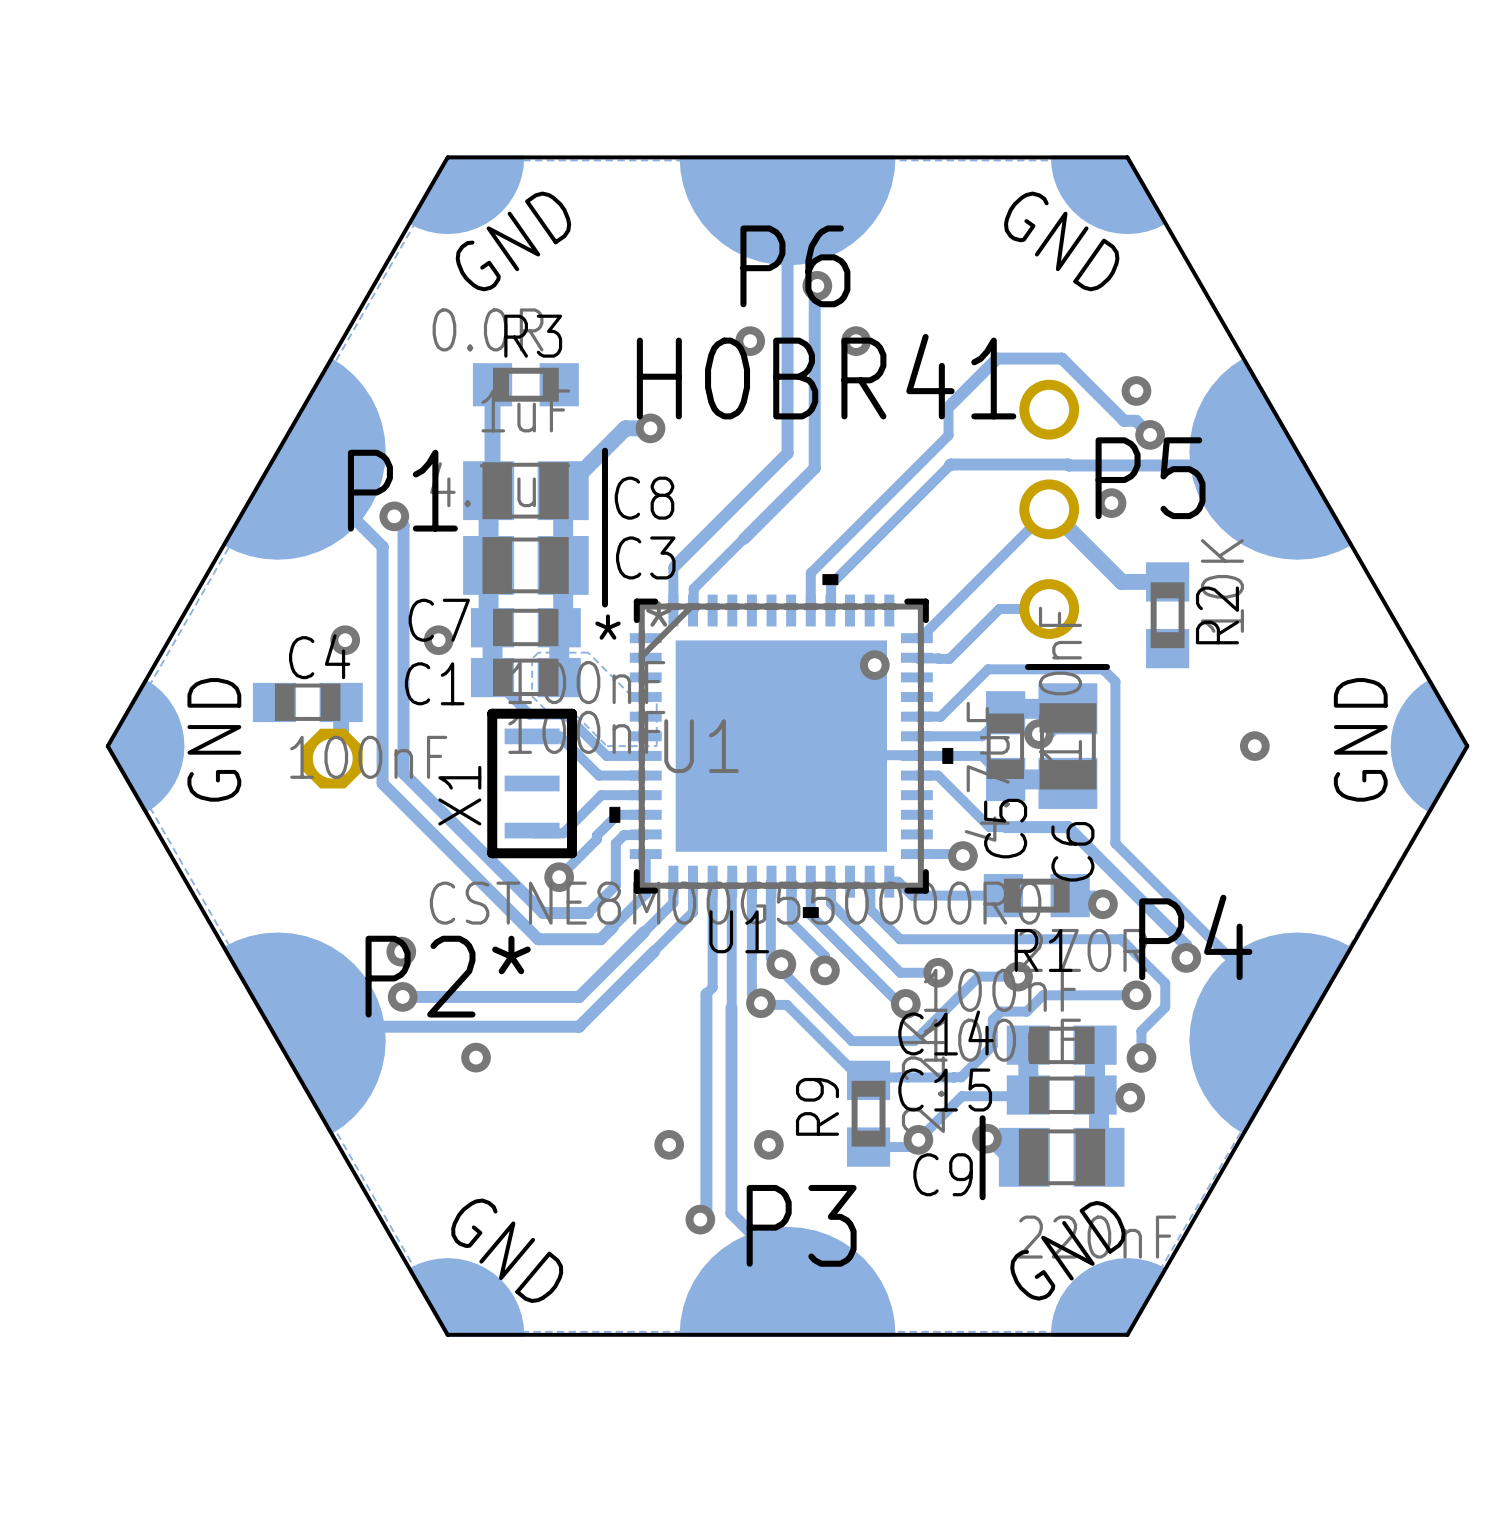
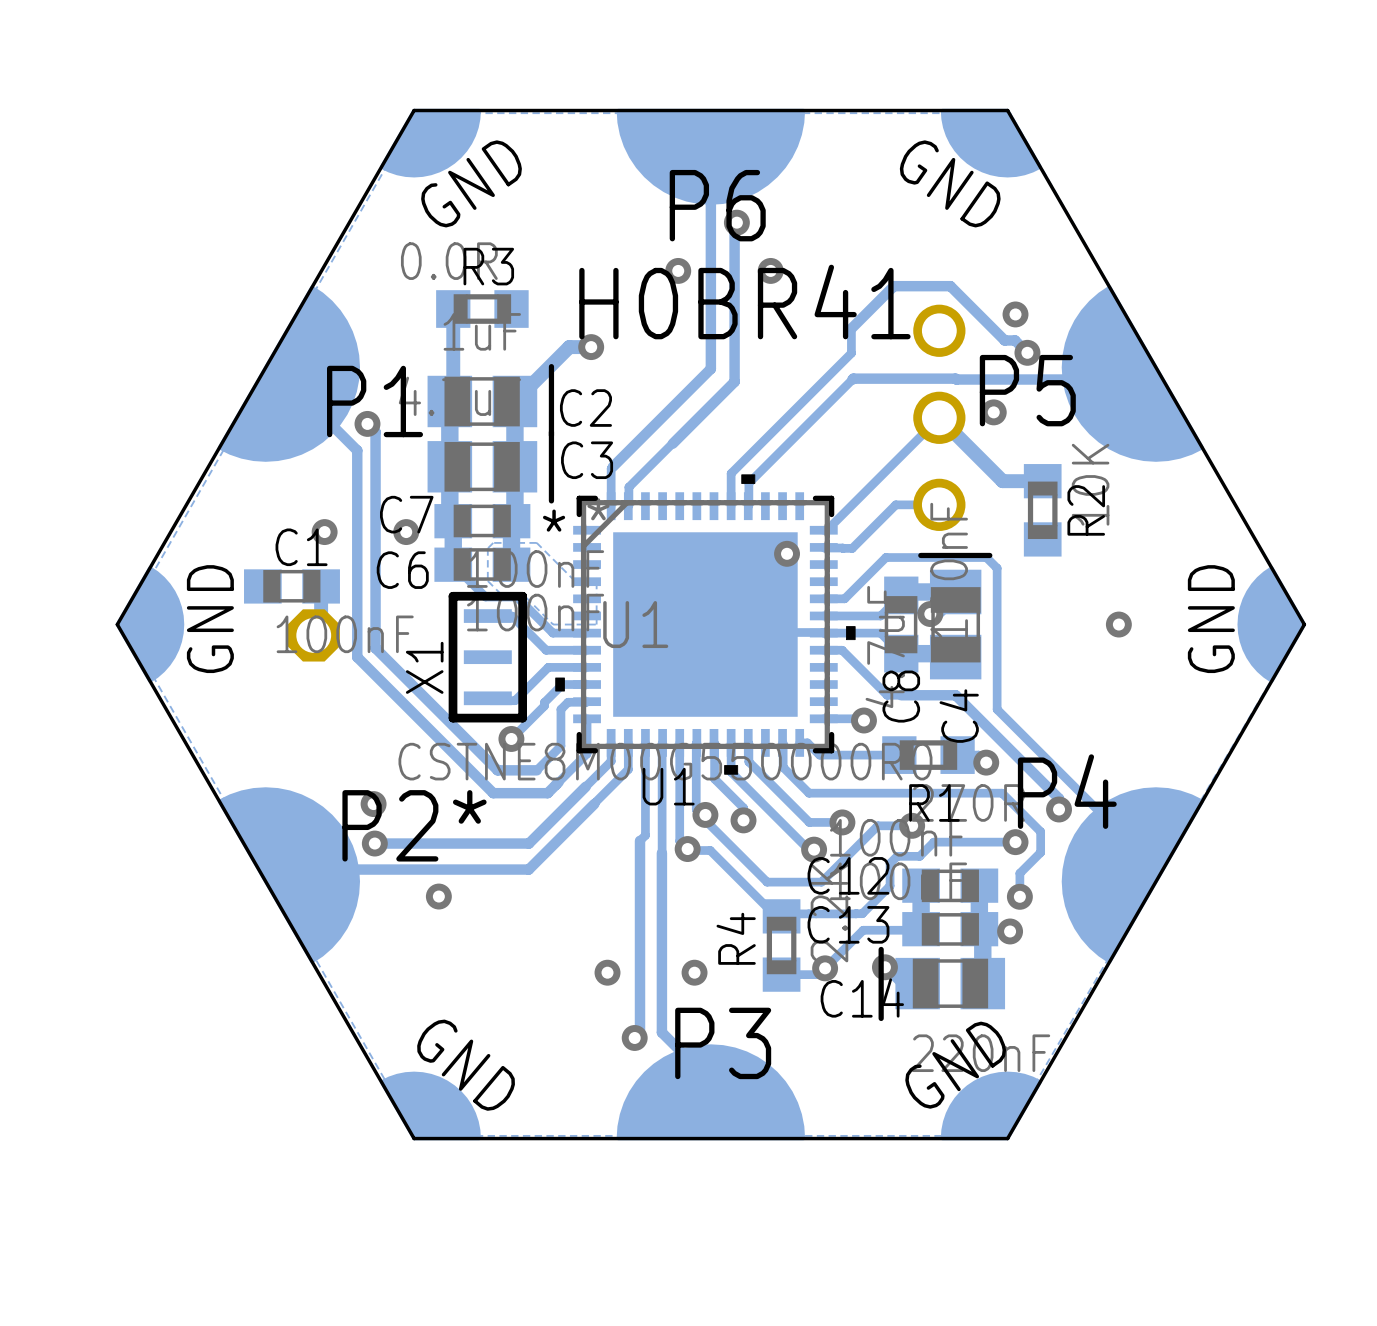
C8 name: C8 (644, 498) -> C2 (585, 408)
C4 name: C4 (319, 656) -> C1 (301, 547)
C1 name: C1 (434, 683) -> C6 (402, 570)
C5 name: C5 (1005, 828) -> C8 (901, 696)
C6 name: C6 (1072, 851) -> C4 (959, 716)
C14 name: C14 (946, 1033) -> C12 (848, 875)
C15 name: C15 (945, 1090) -> C13 (848, 924)
R9 name: R9 (817, 1106) -> R4 (736, 938)
C9 name: C9 (943, 1174) -> C14 (862, 997)

